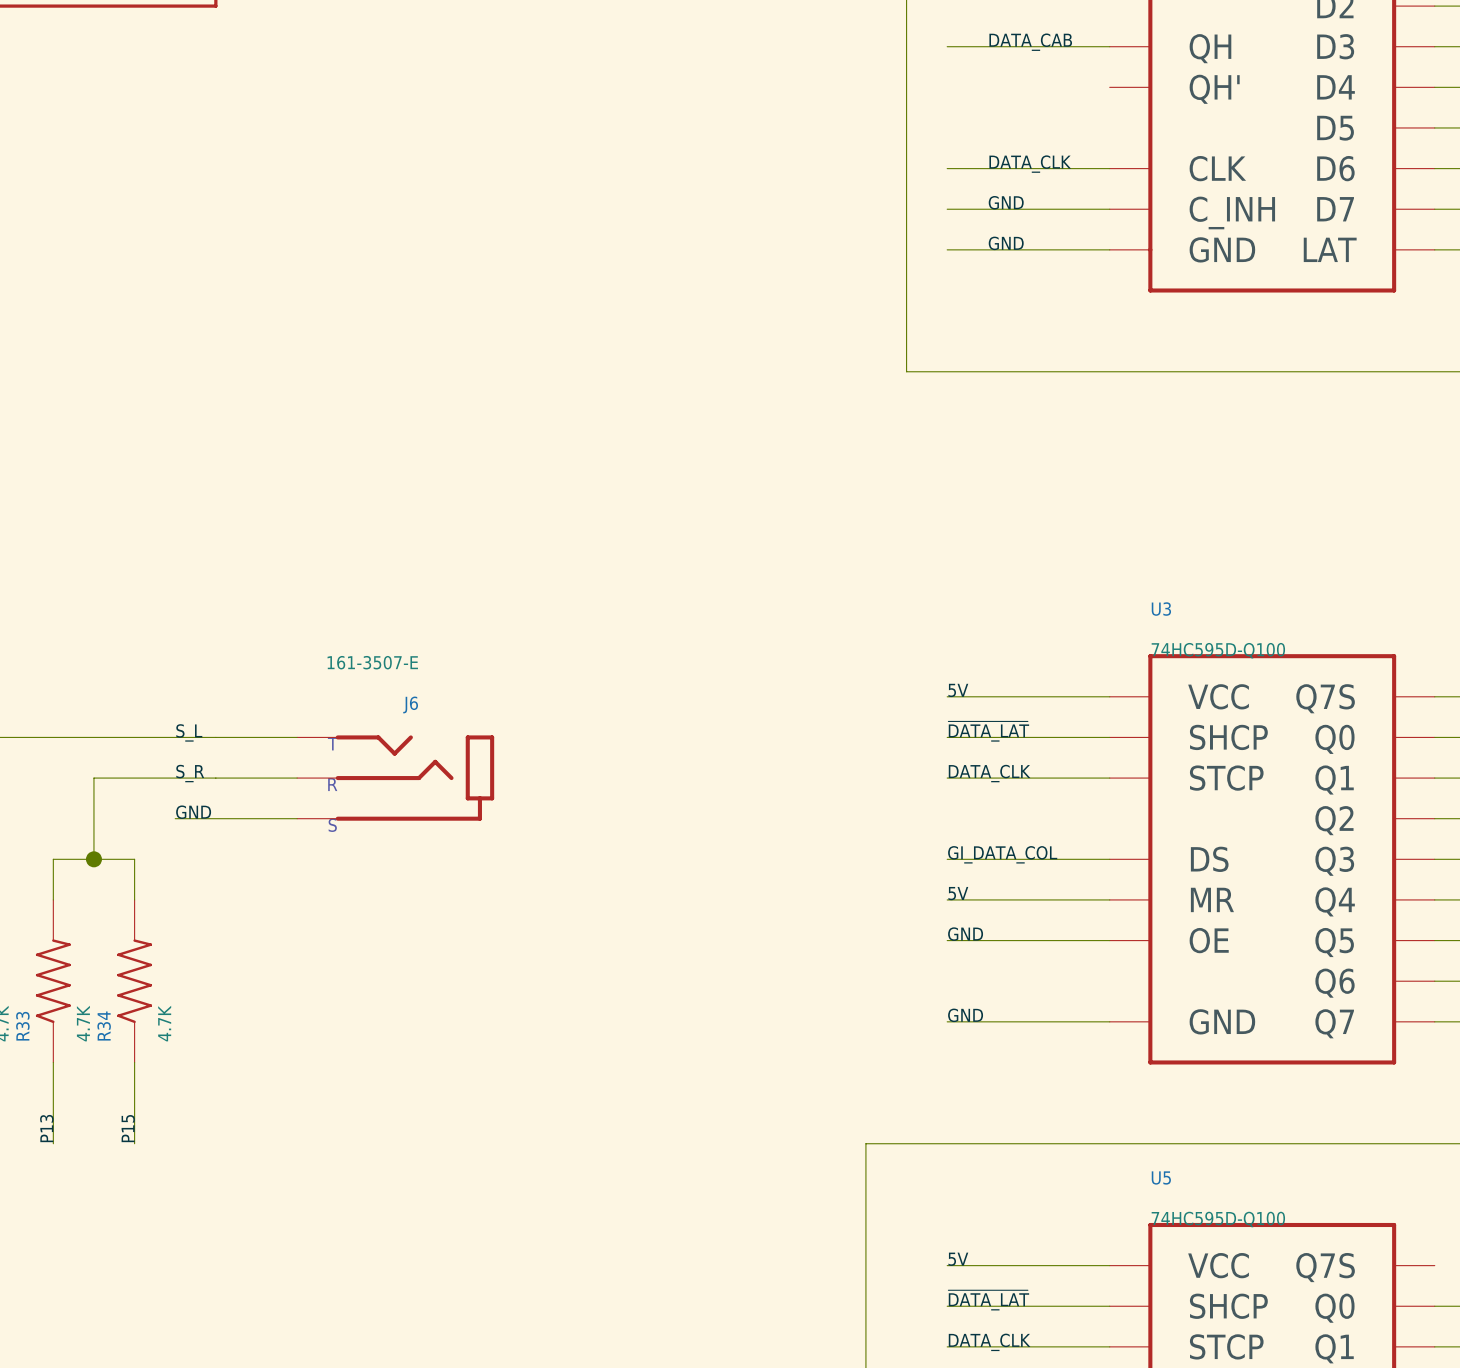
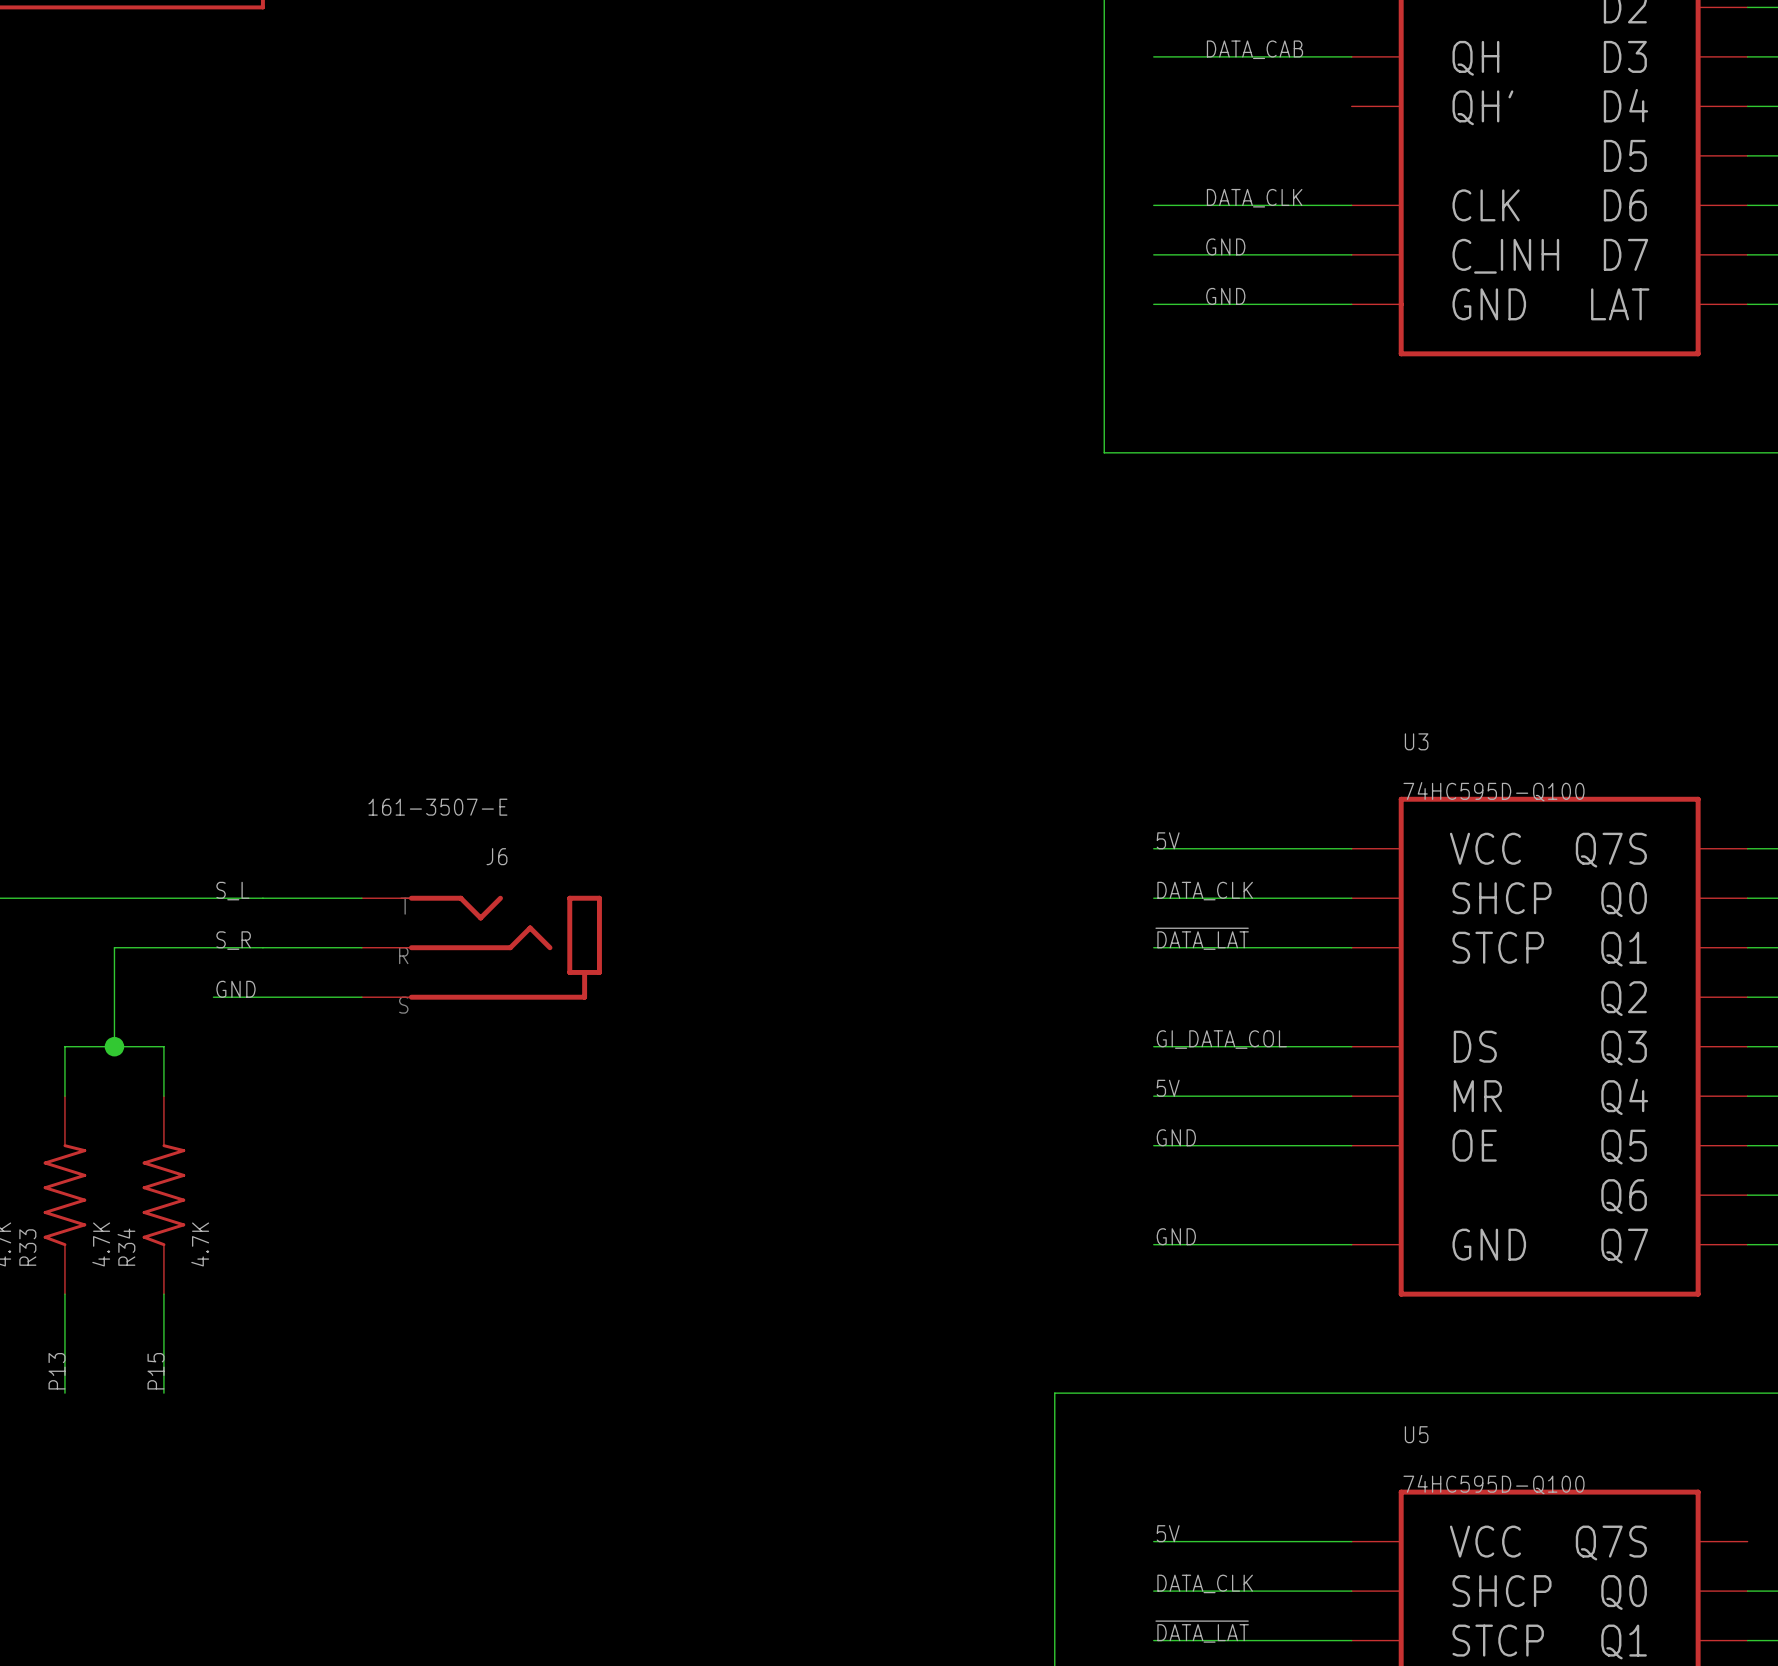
label: ~{DATA_LAT} (988, 731) -> DATA_CLK (1205, 891)
label: DATA_CLK (989, 773) -> ~{DATA_LAT} (1202, 938)
label: ~{DATA_LAT} (988, 1300) -> DATA_CLK (1205, 1583)
label: DATA_CLK (989, 1342) -> ~{DATA_LAT} (1202, 1631)

